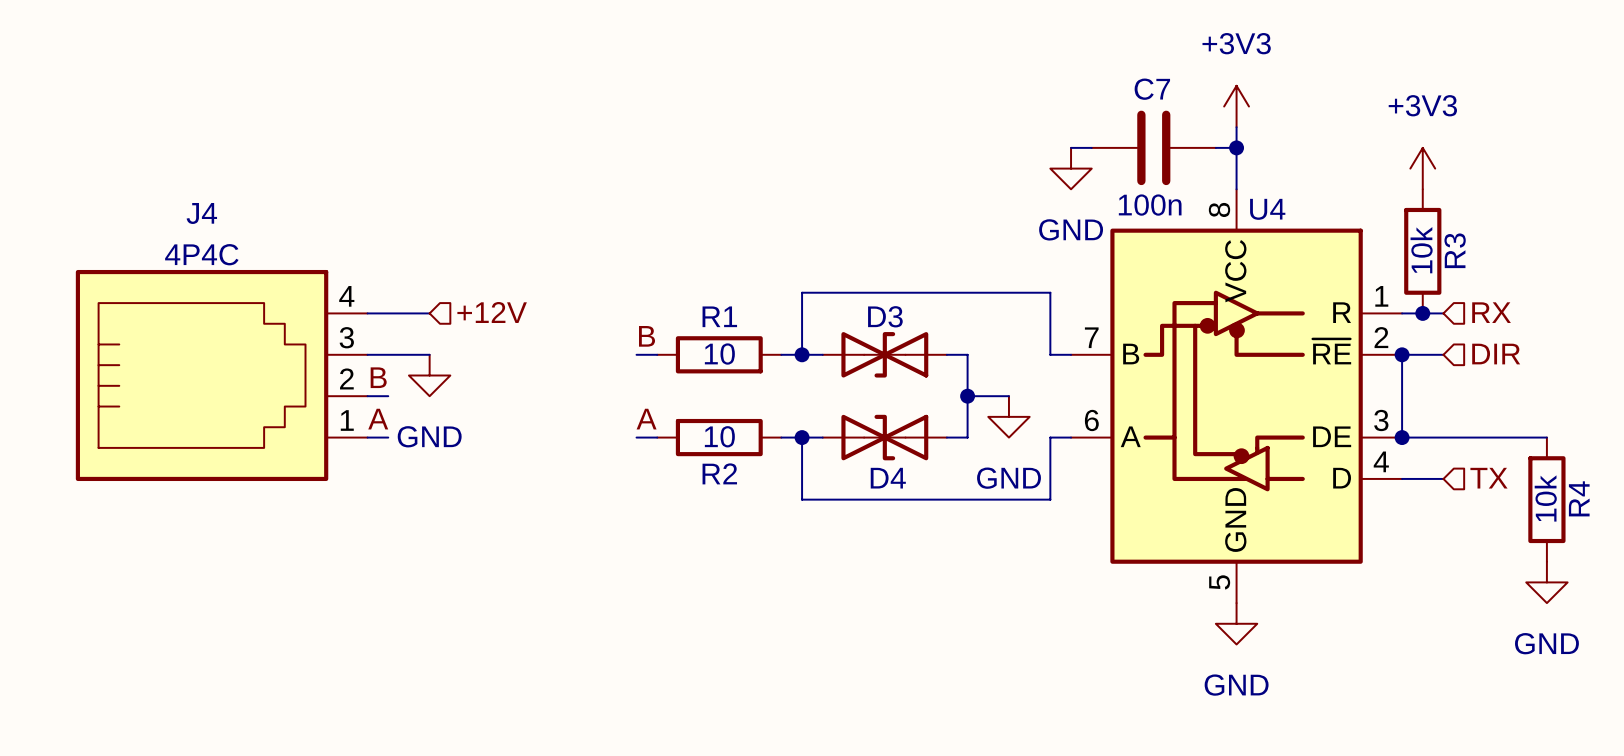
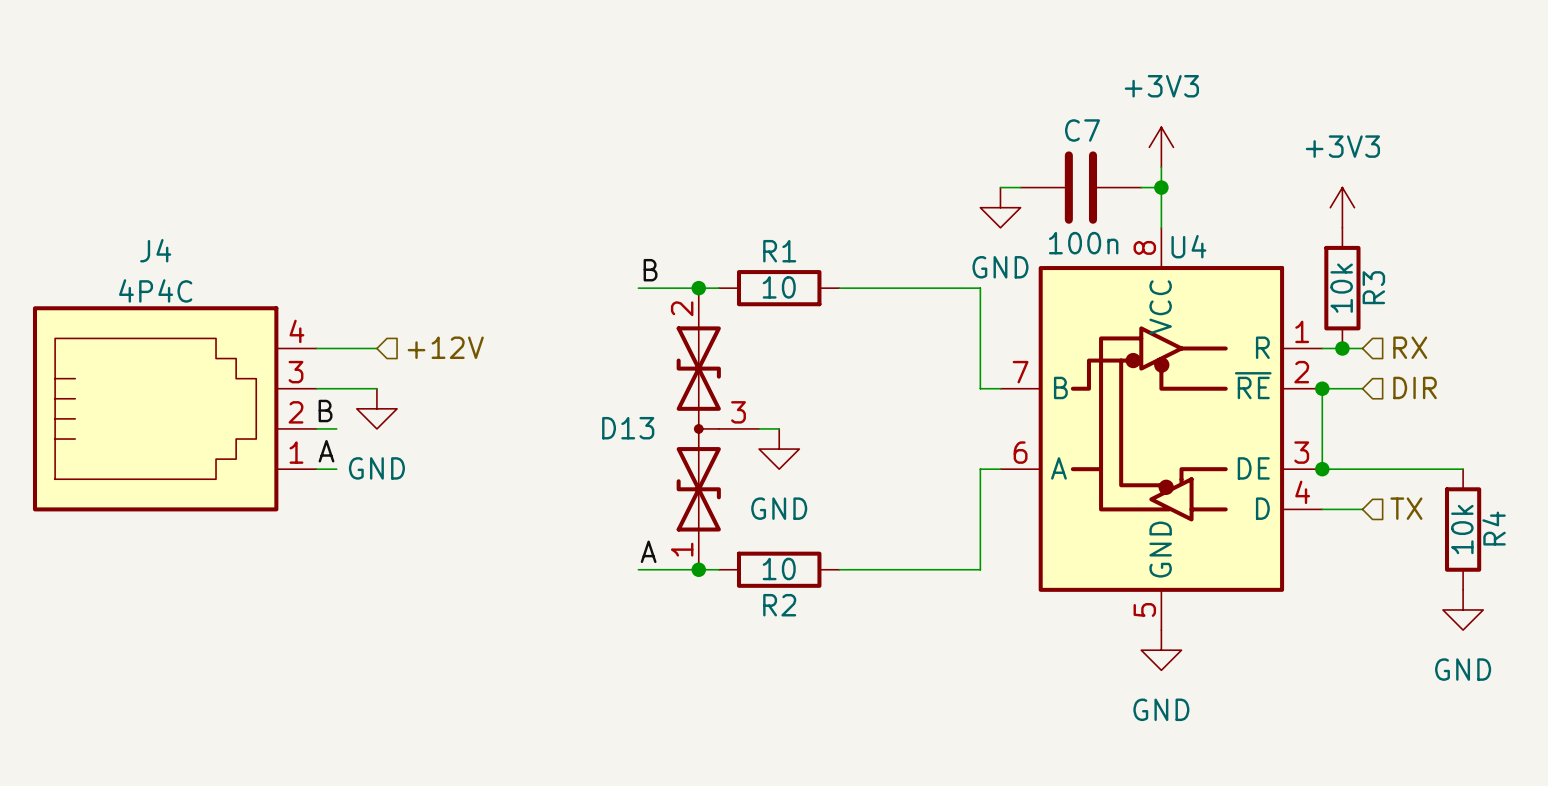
wire: none -> (638, 288) (718, 288)
junction: none -> (698, 288)
wire: (1050, 292) (802, 292) (802, 354) -> (980, 328) (980, 288) (839, 288)
label position: B (647, 336) -> B (650, 270)
wire: (636, 354) (657, 354) -> none
R1 position: (719, 354) -> (779, 288)
wire: (781, 354) (822, 354) -> none
junction: (802, 354) -> none
D3: (884, 354) -> none
wire: (946, 354) (967, 354) (967, 437) (946, 437) -> none
D13: none -> (717, 428)
wire: (967, 396) (1008, 396) -> none
junction: (967, 396) -> none
power symbol position: GND (1008, 416) -> GND (779, 449)
label position: A (646, 419) -> A (648, 551)
wire: (636, 437) (657, 437) -> (759, 428) (779, 428)
R2 position: (719, 437) -> (779, 569)
wire: (781, 437) (822, 437) -> none
wire: (802, 437) (802, 499) (1050, 499) -> (839, 569) (980, 569) (980, 529)
junction: (802, 437) -> none
D4: (884, 437) -> none
wire: none -> (638, 569) (718, 569)
junction: none -> (698, 569)

